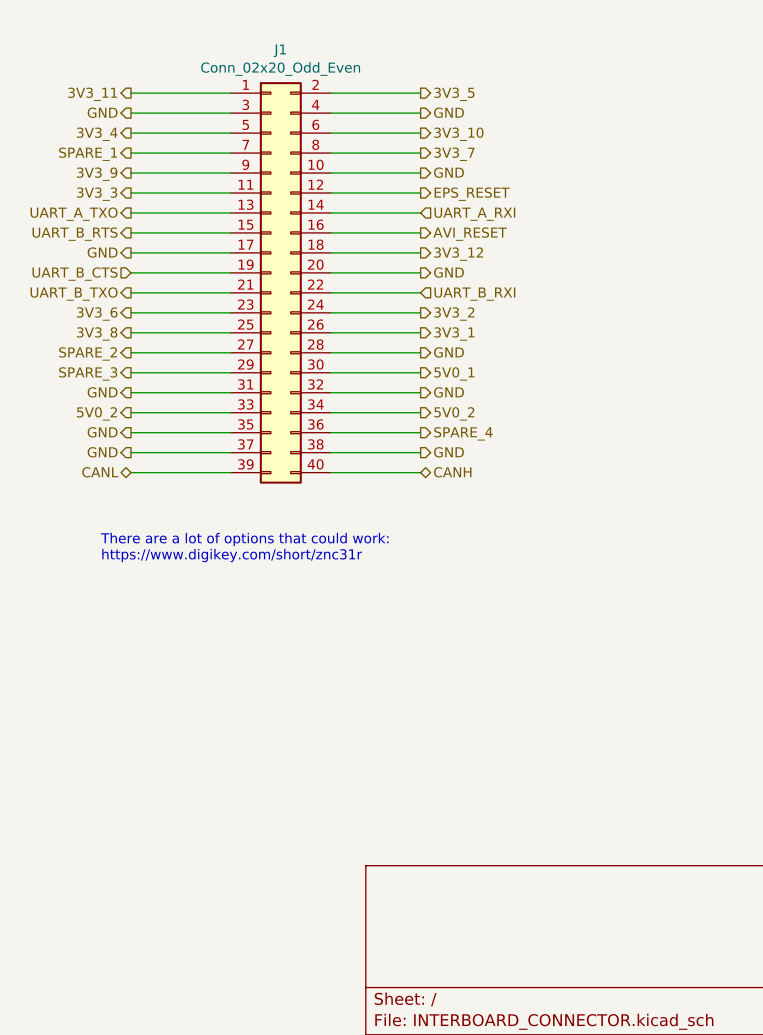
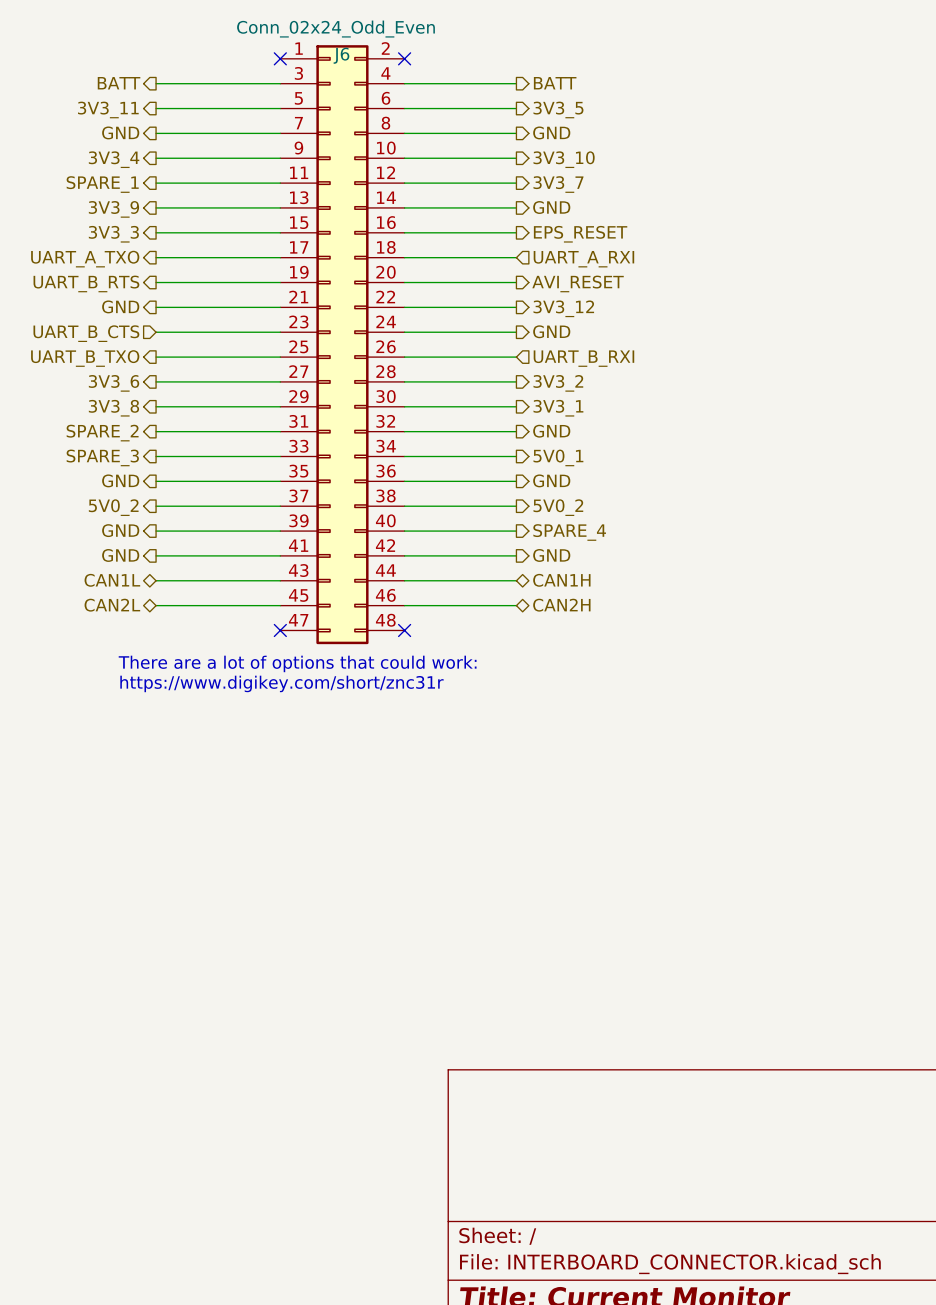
no-connect mark: none -> (280, 58)
no-connect mark: none -> (404, 58)
hierarchical label: none -> BATT (119, 83)
hierarchical label: none -> BATT (555, 83)
wire: none -> (156, 83) (280, 83)
wire: none -> (404, 83) (516, 83)
J1: Conn_02x20_Odd_Even (280, 282) -> none
J6: none -> Conn_02x24_Odd_Even (342, 344)
hierarchical label: CANL (100, 472) -> CAN1L (112, 580)
hierarchical label: CANH (452, 472) -> CAN1H (561, 580)
hierarchical label: none -> CAN2L (112, 605)
wire: none -> (156, 605) (280, 605)
wire: none -> (404, 605) (516, 605)
hierarchical label: none -> CAN2H (561, 605)
no-connect mark: none -> (280, 630)
no-connect mark: none -> (404, 630)

